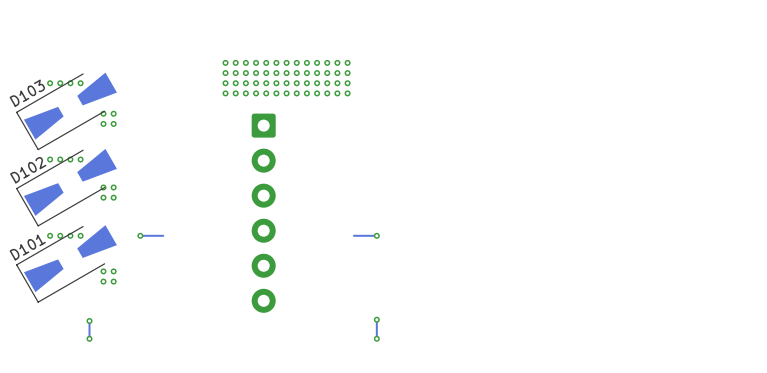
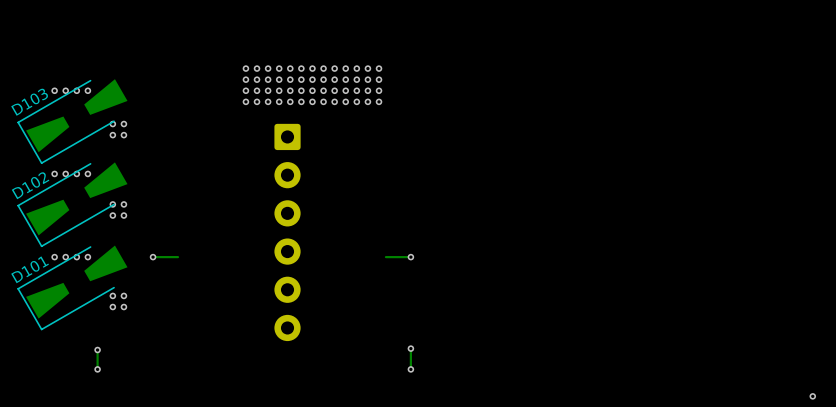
via: none -> (812, 396)

